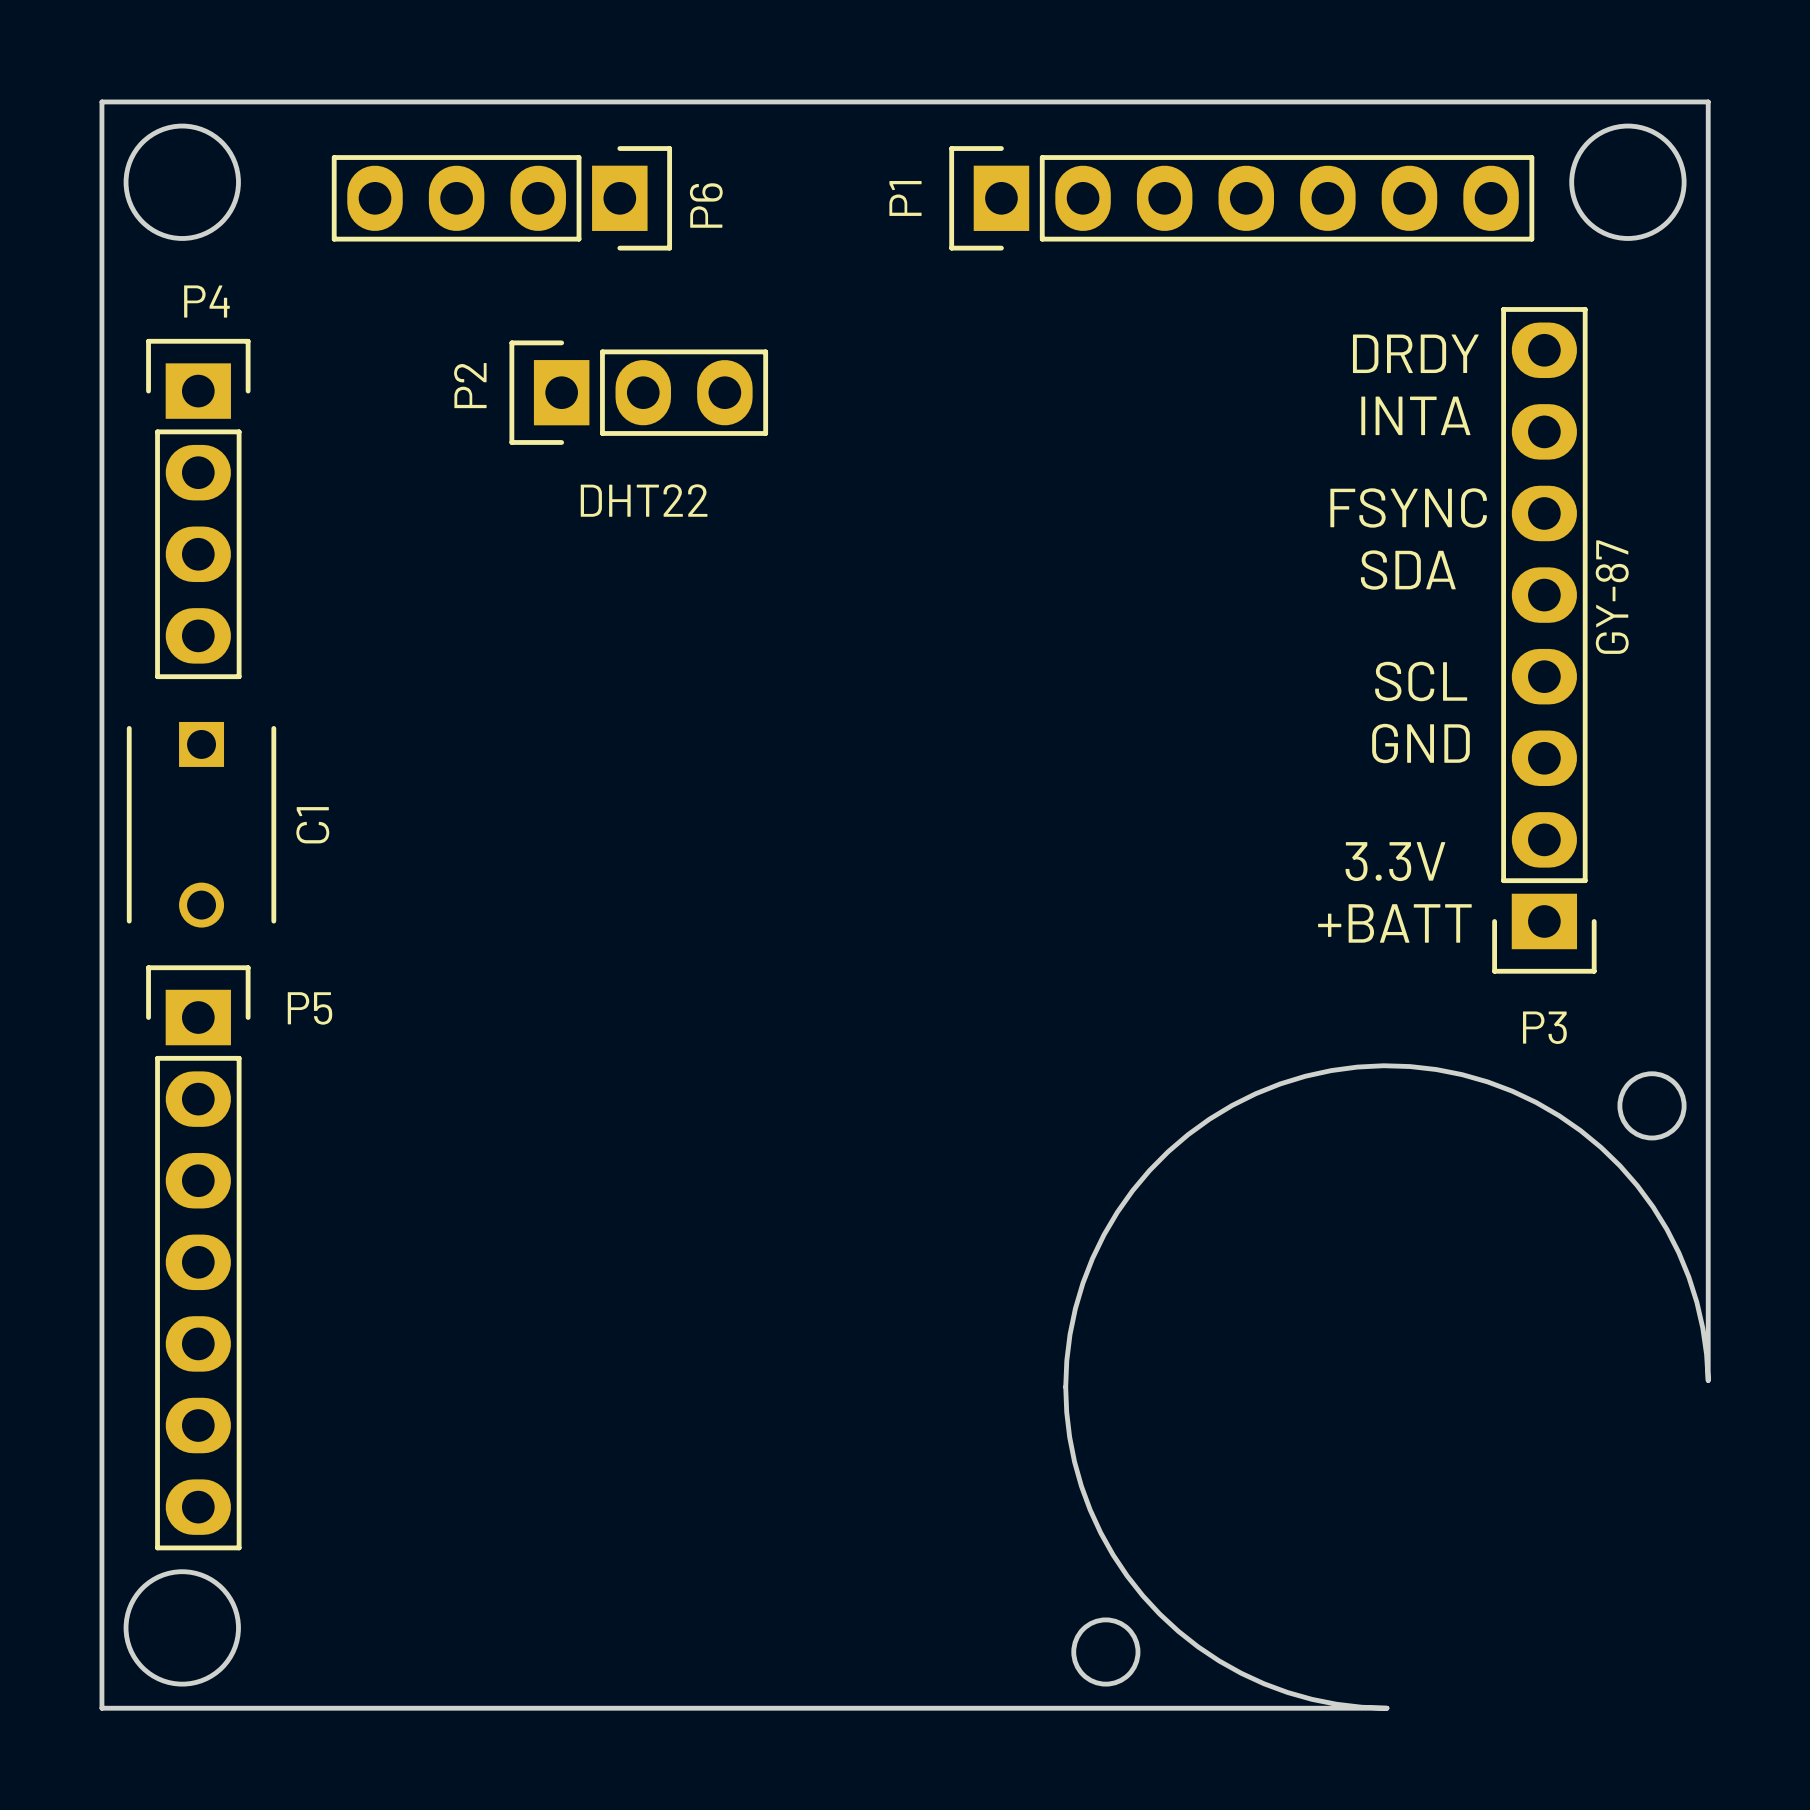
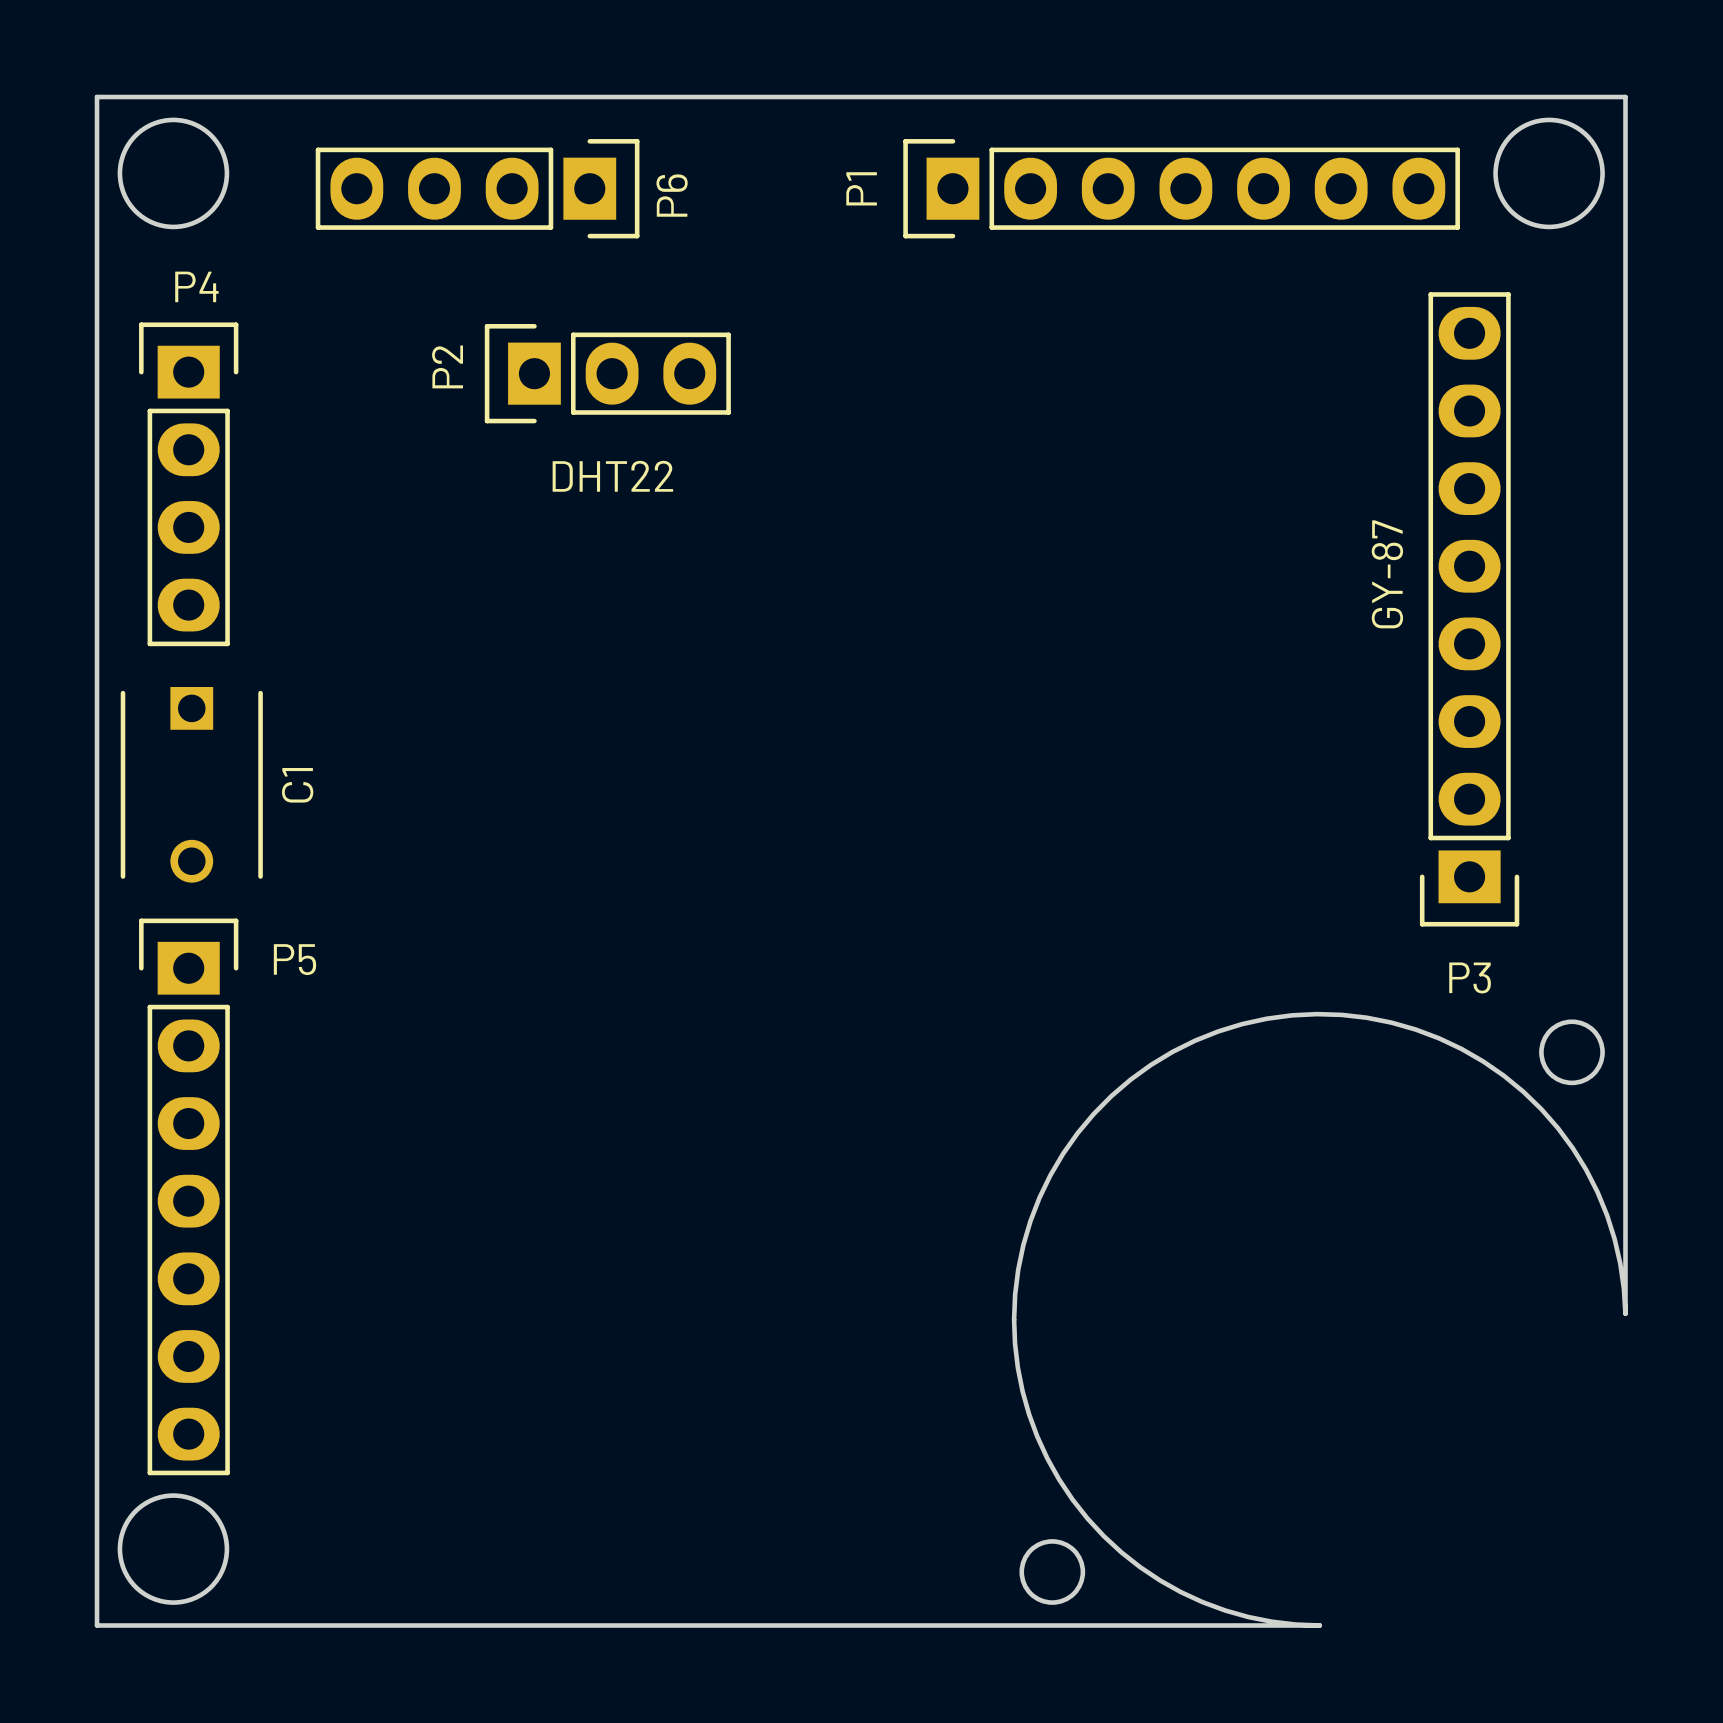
text: DRDY (1415, 353) -> none
text: INTA (1415, 415) -> none
text: FSYNC (1408, 508) -> none
text: SDA (1408, 570) -> none
P3 value position: GY-87 (1612, 597) -> GY-87 (1387, 574)
text: SCL (1421, 681) -> none
text: GND (1420, 743) -> none
text: 3.3V (1395, 861) -> none
text: +BATT (1394, 923) -> none

